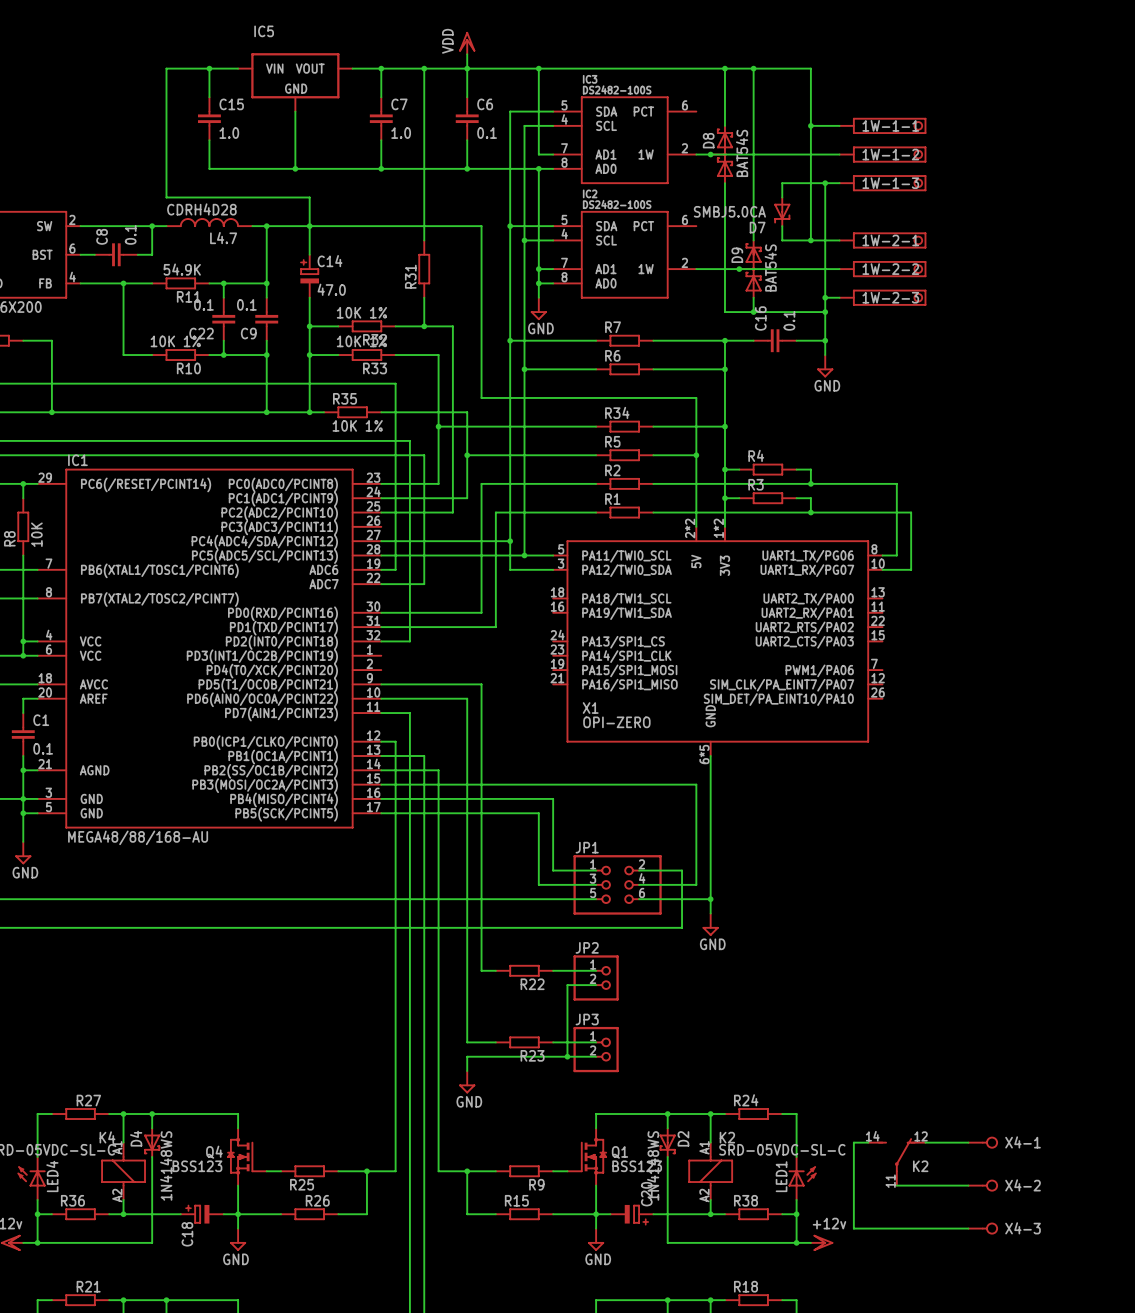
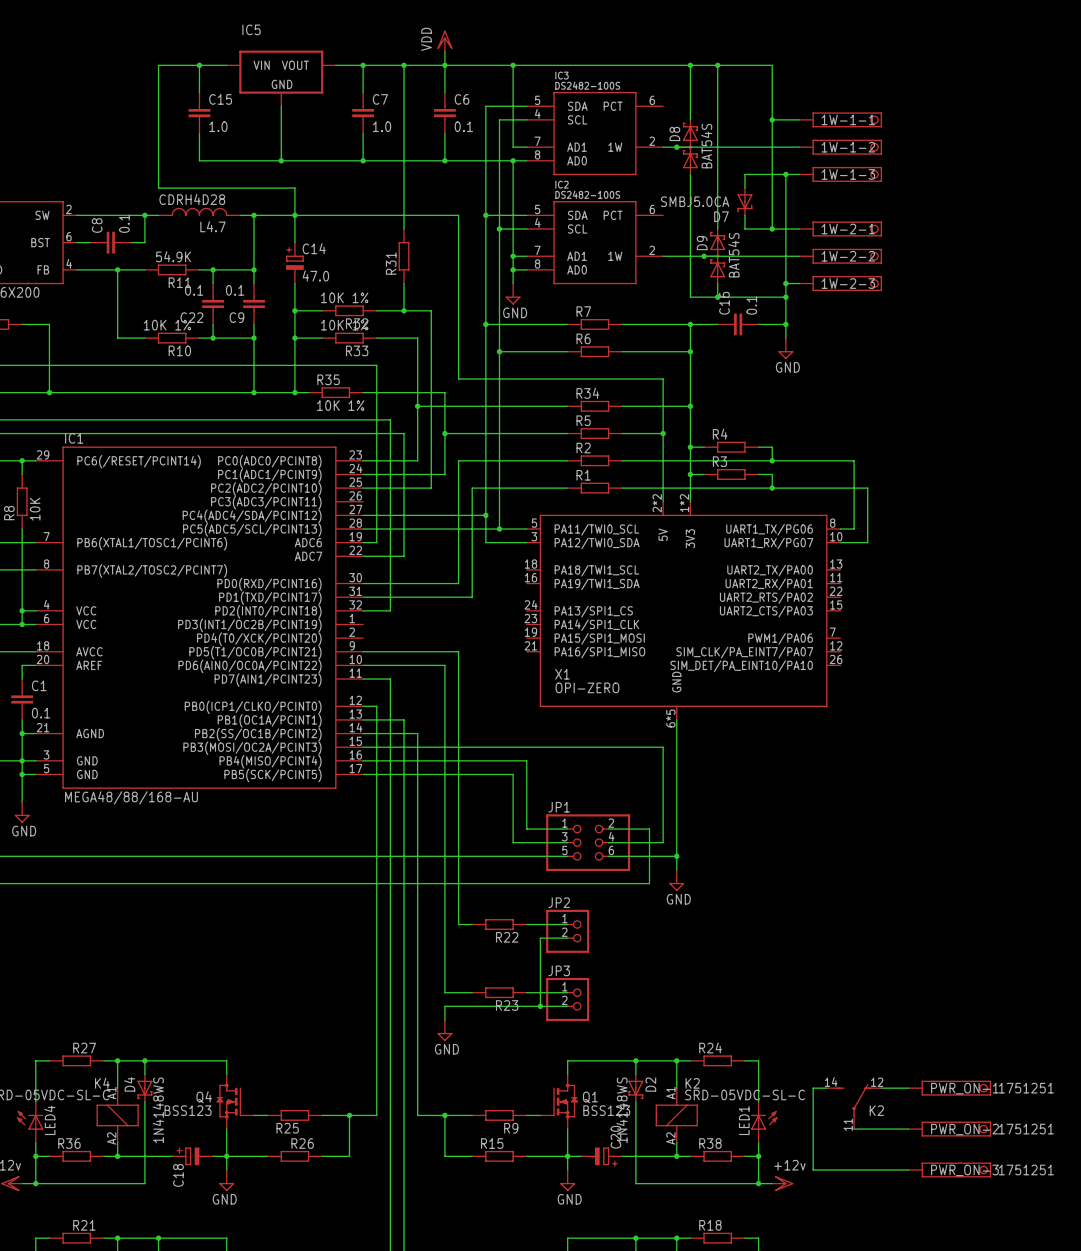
X4-1: (983, 1142) -> none
PWR_ON-1: none -> 1751251 (949, 1088)
X4-2: (983, 1185) -> none
PWR_ON-2: none -> 1751251 (949, 1129)
X4-3: (983, 1228) -> none
PWR_ON-3: none -> 1751251 (949, 1169)

